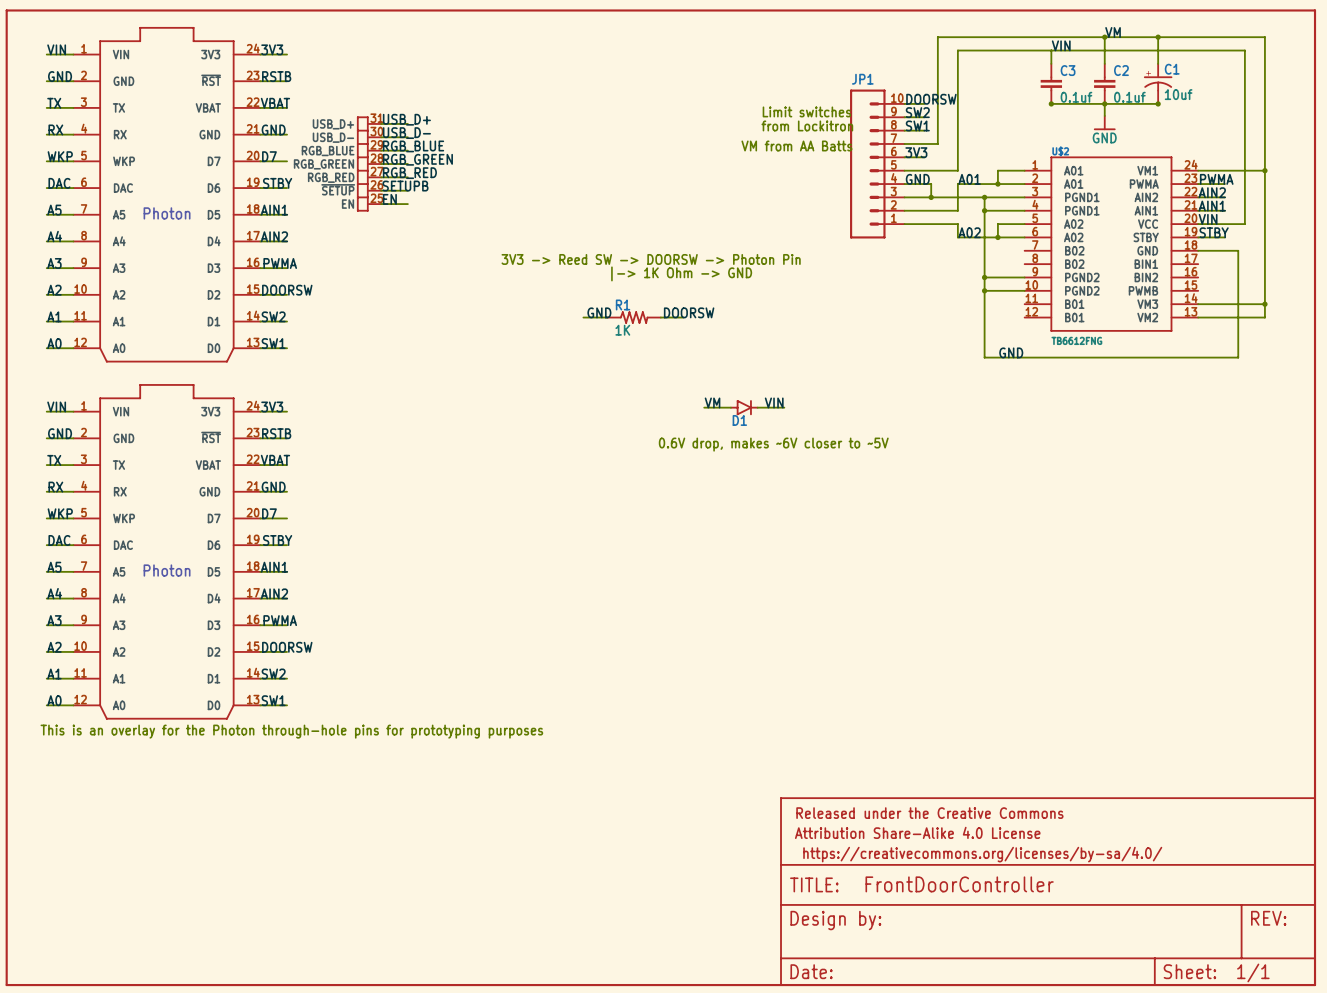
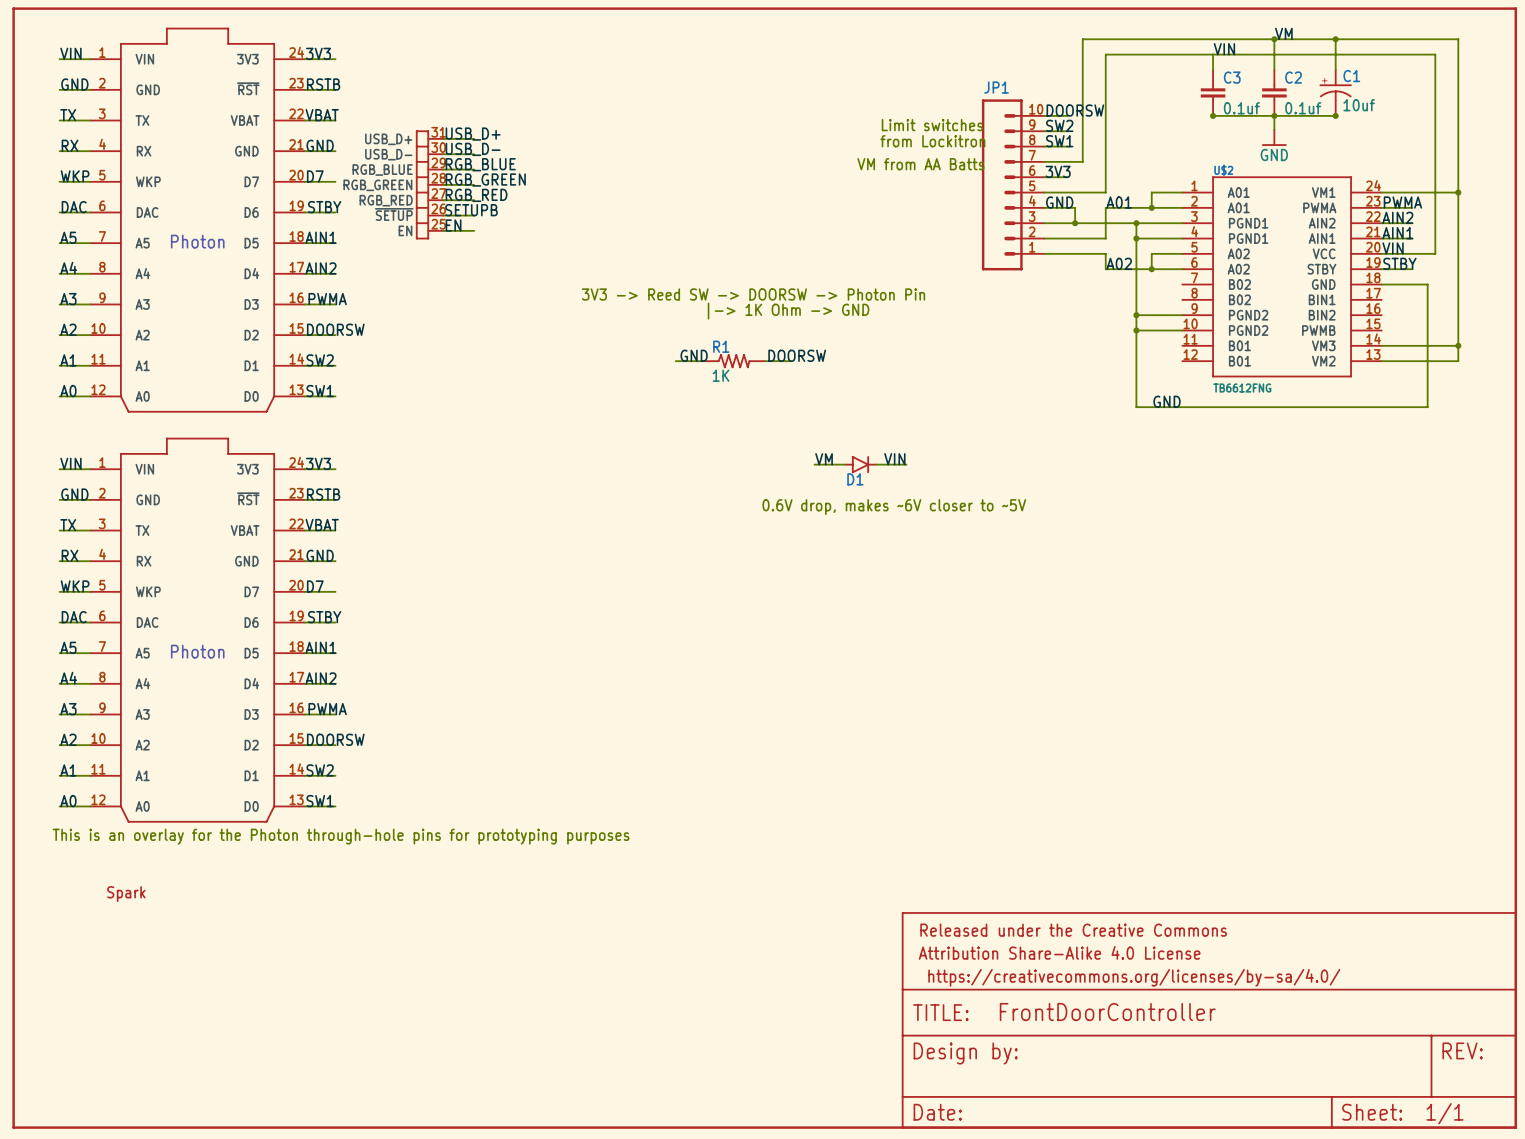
part: none -> (126, 894)

